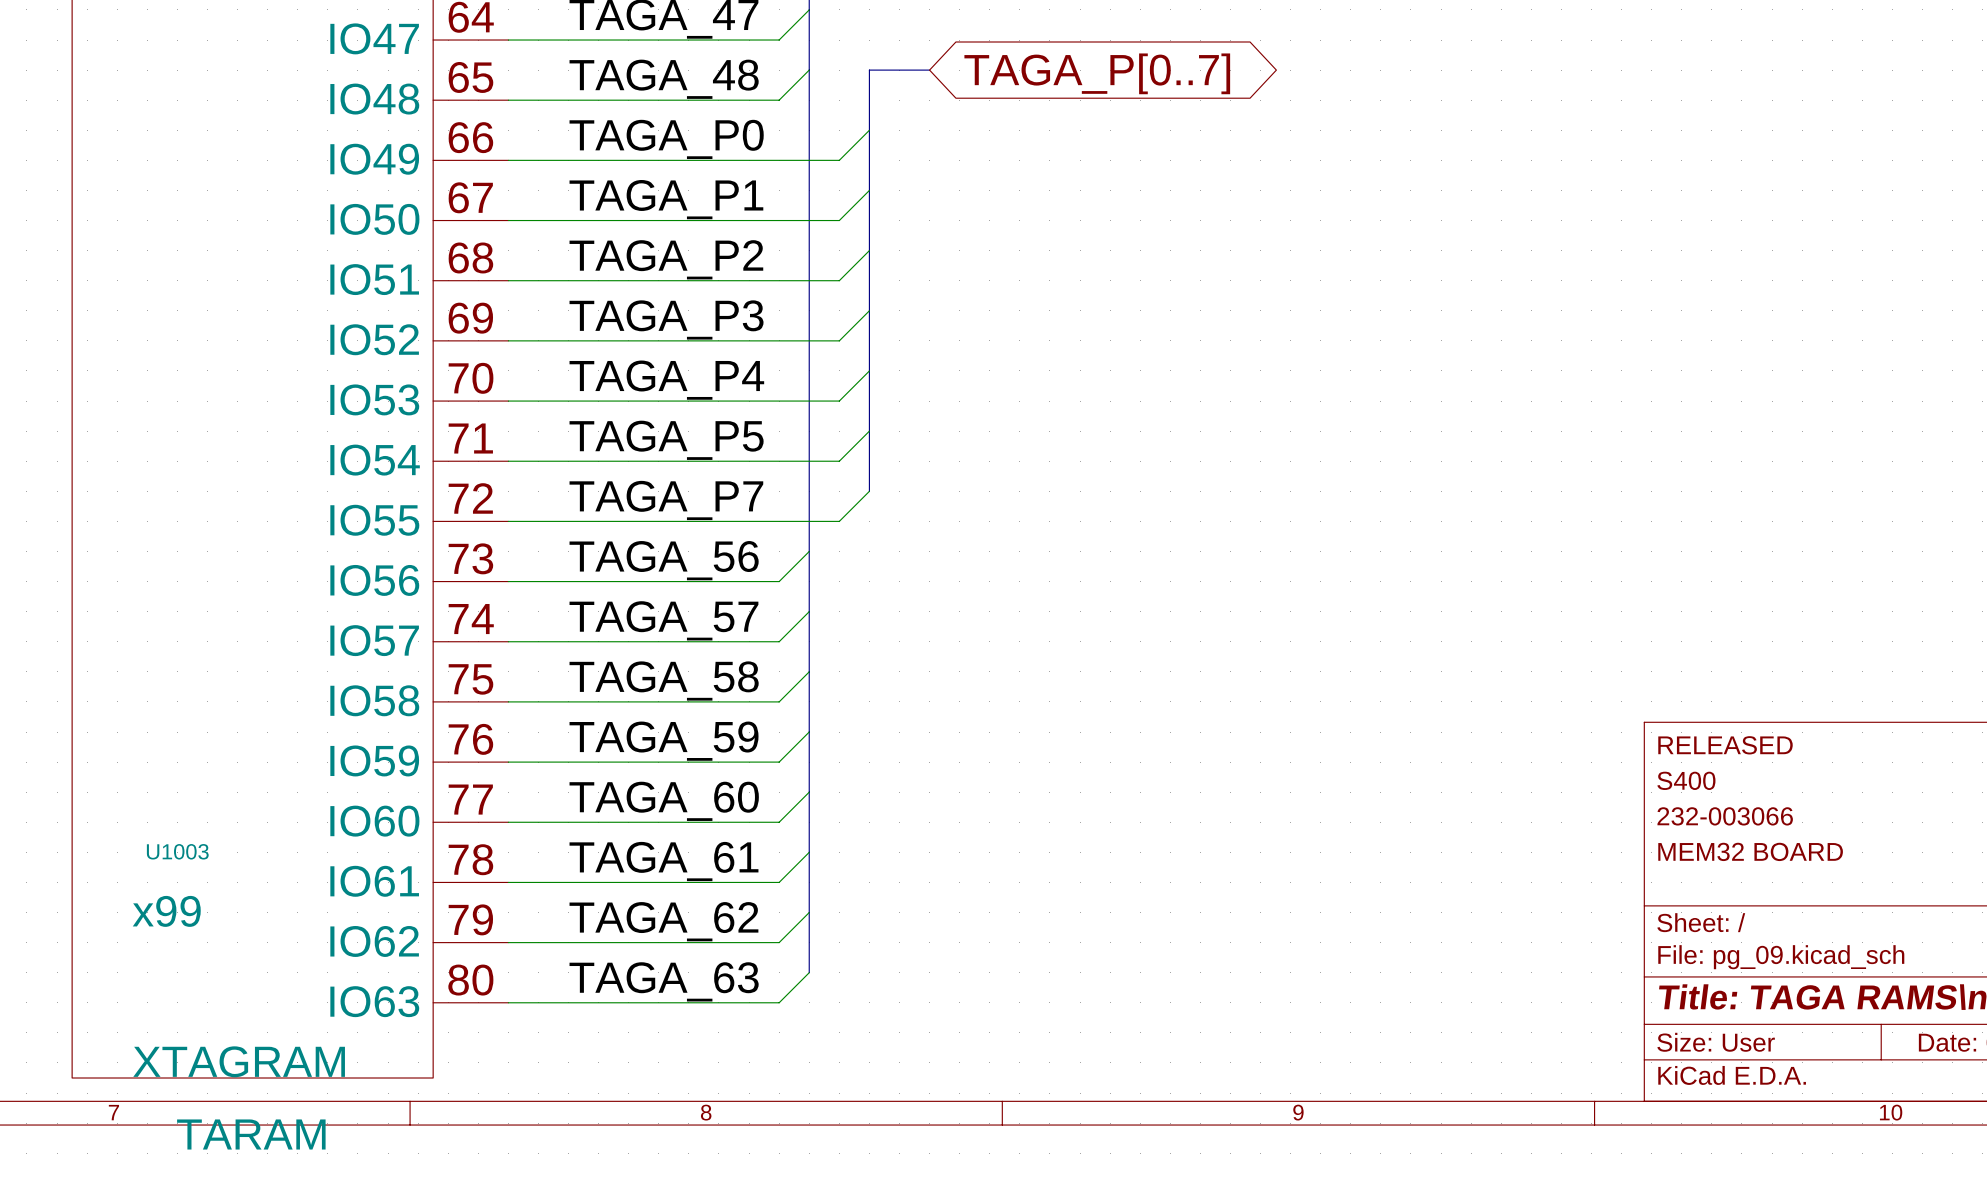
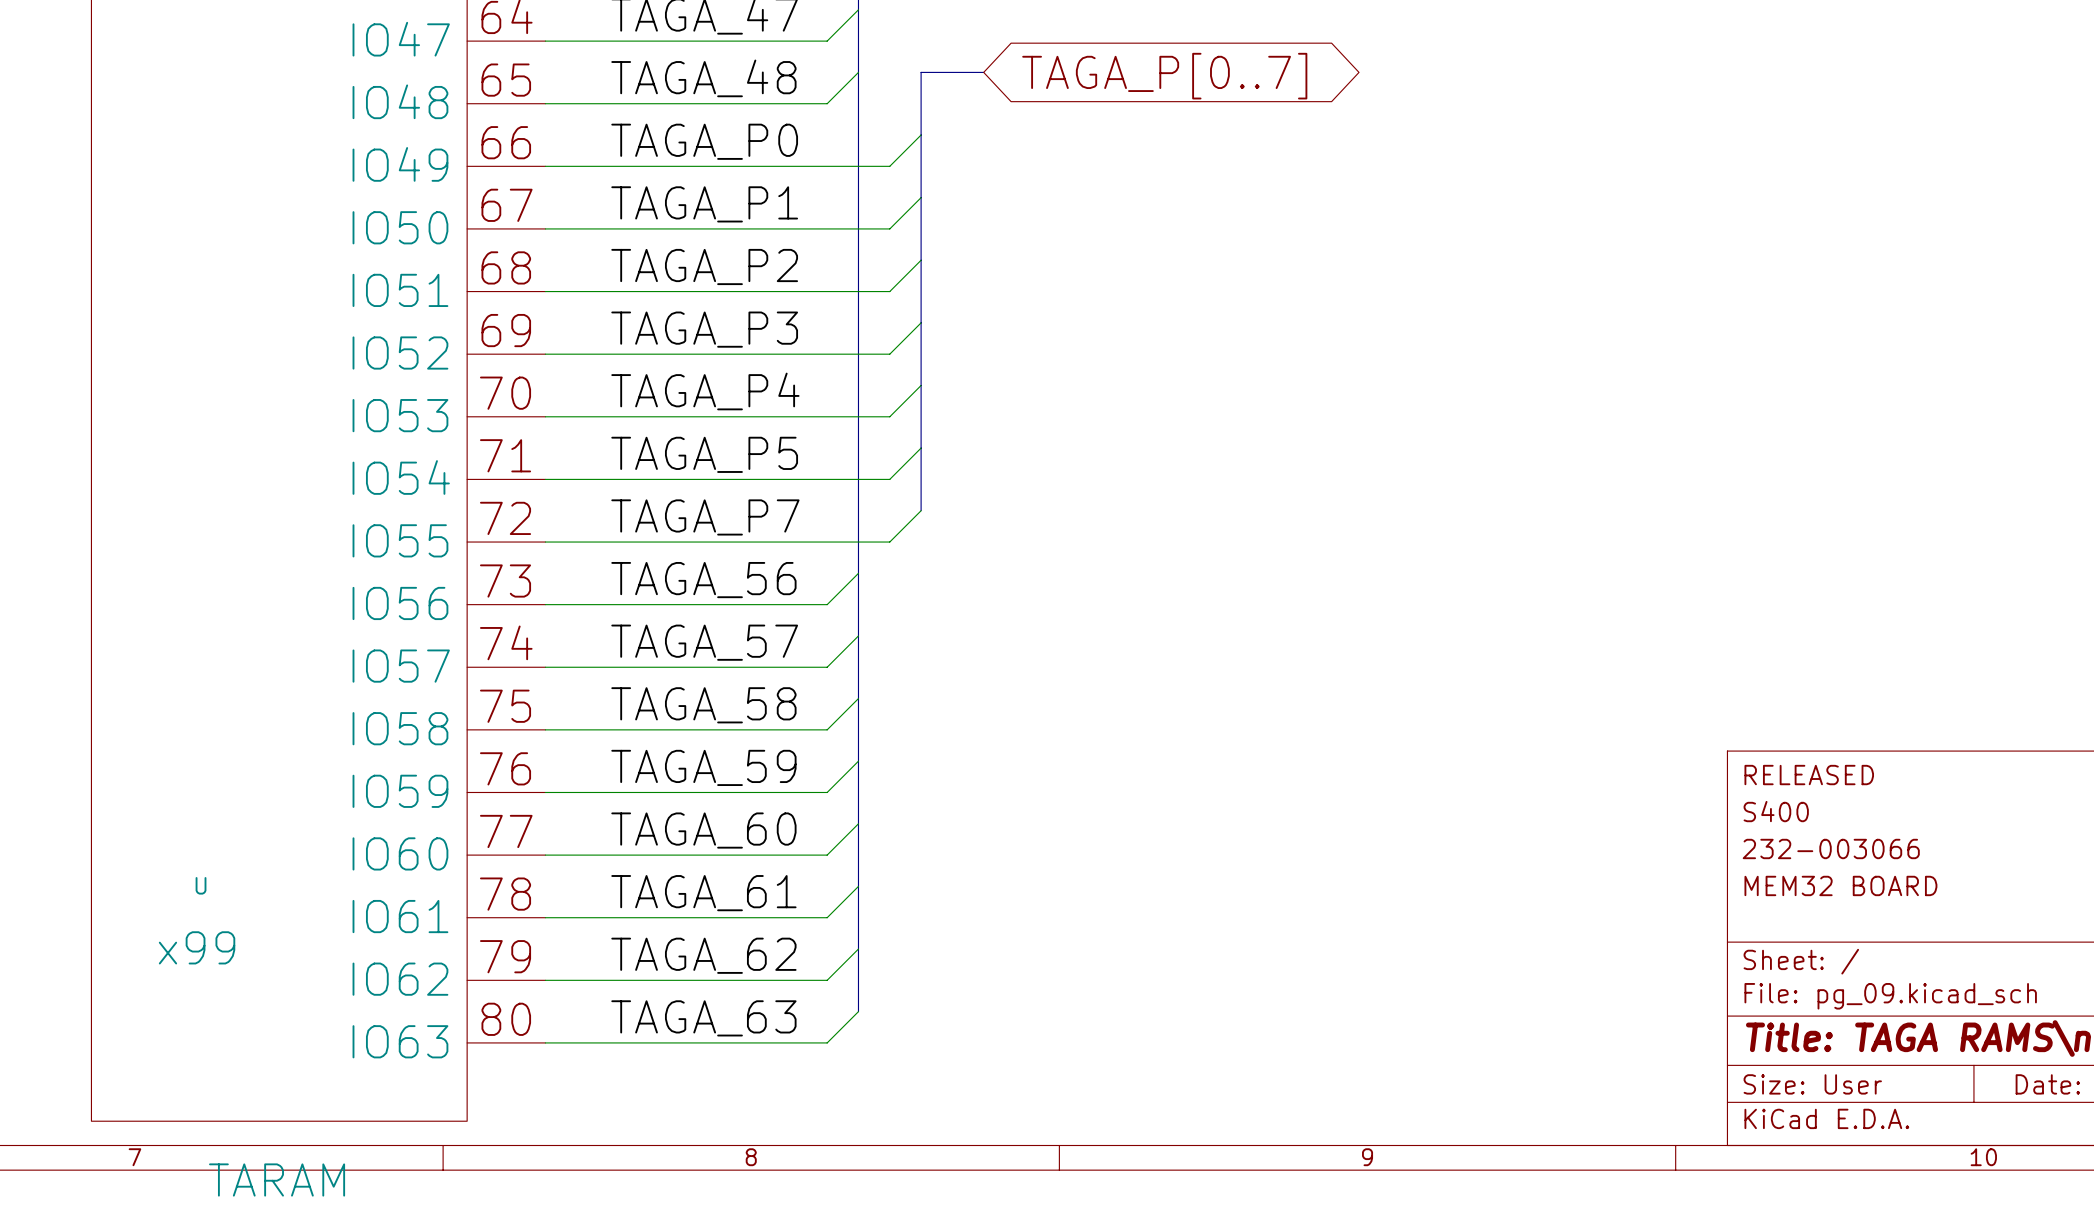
U1003 name: U1003 (177, 851) -> U (201, 885)
U1003 value: XTAGRAM (239, 1061) -> none

